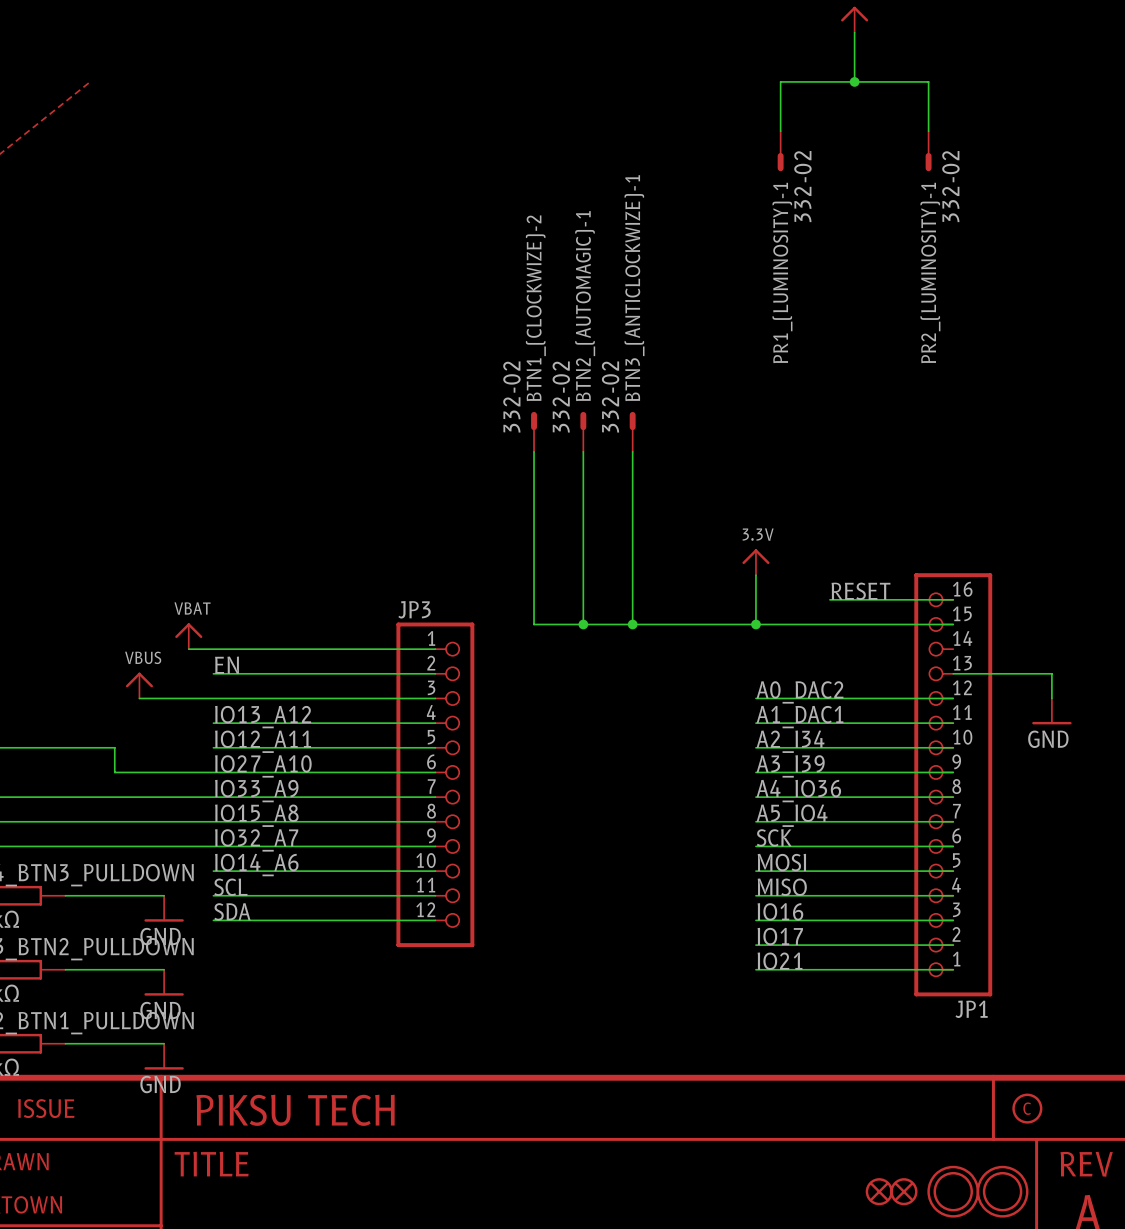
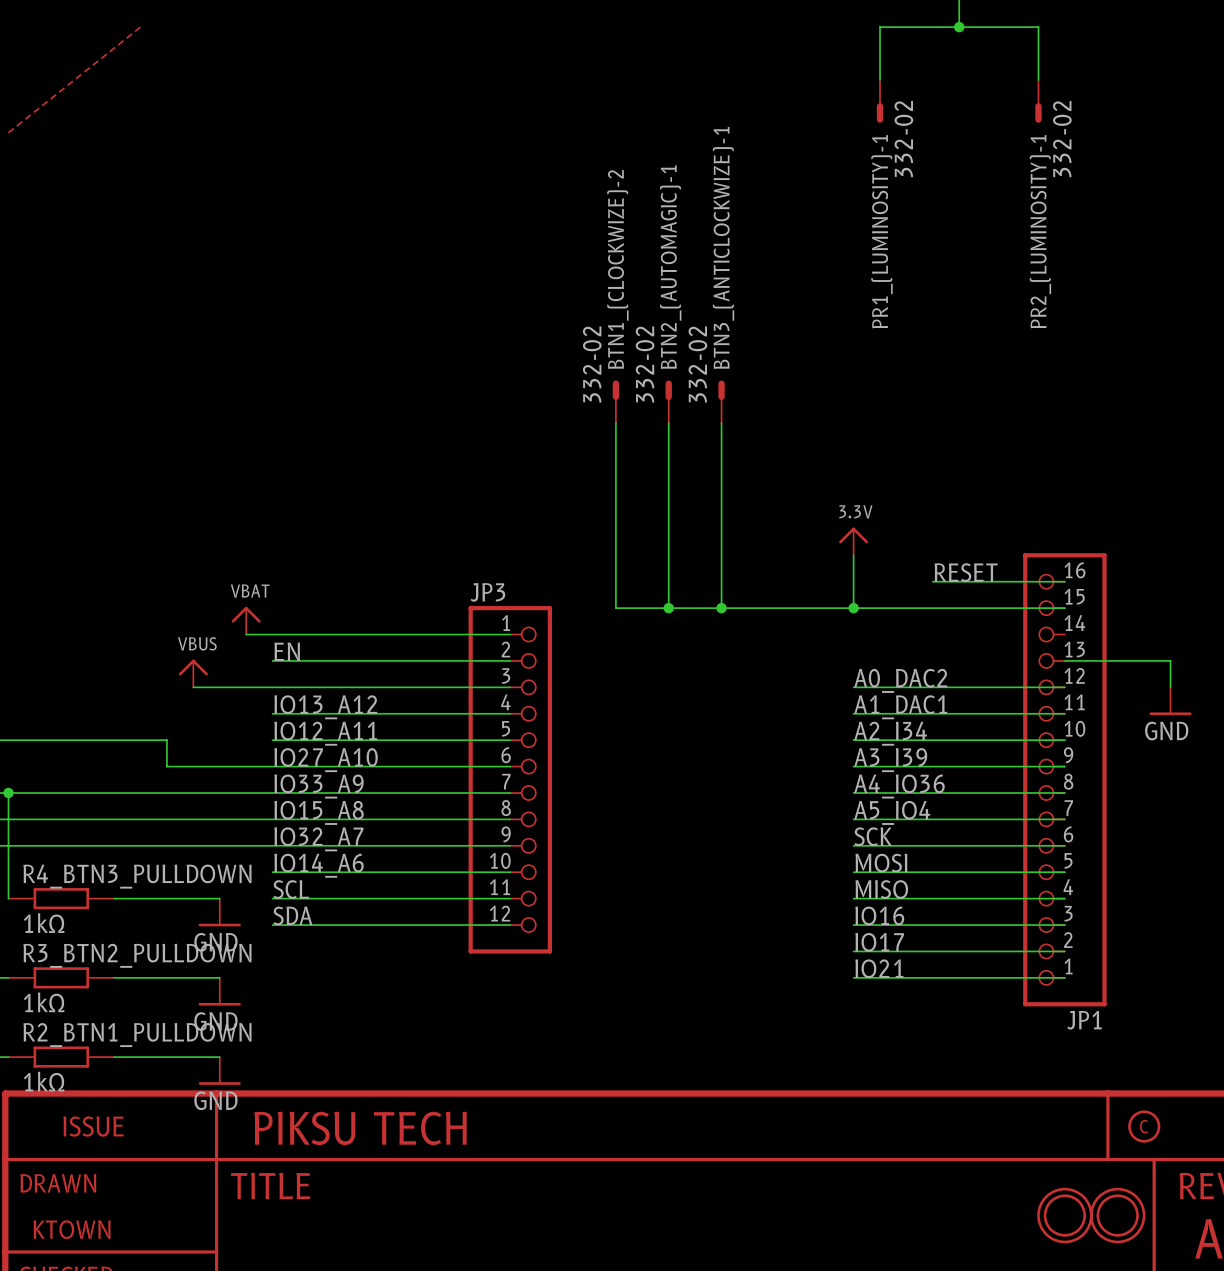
part: (879, 1191) -> none
part: (903, 1191) -> none

